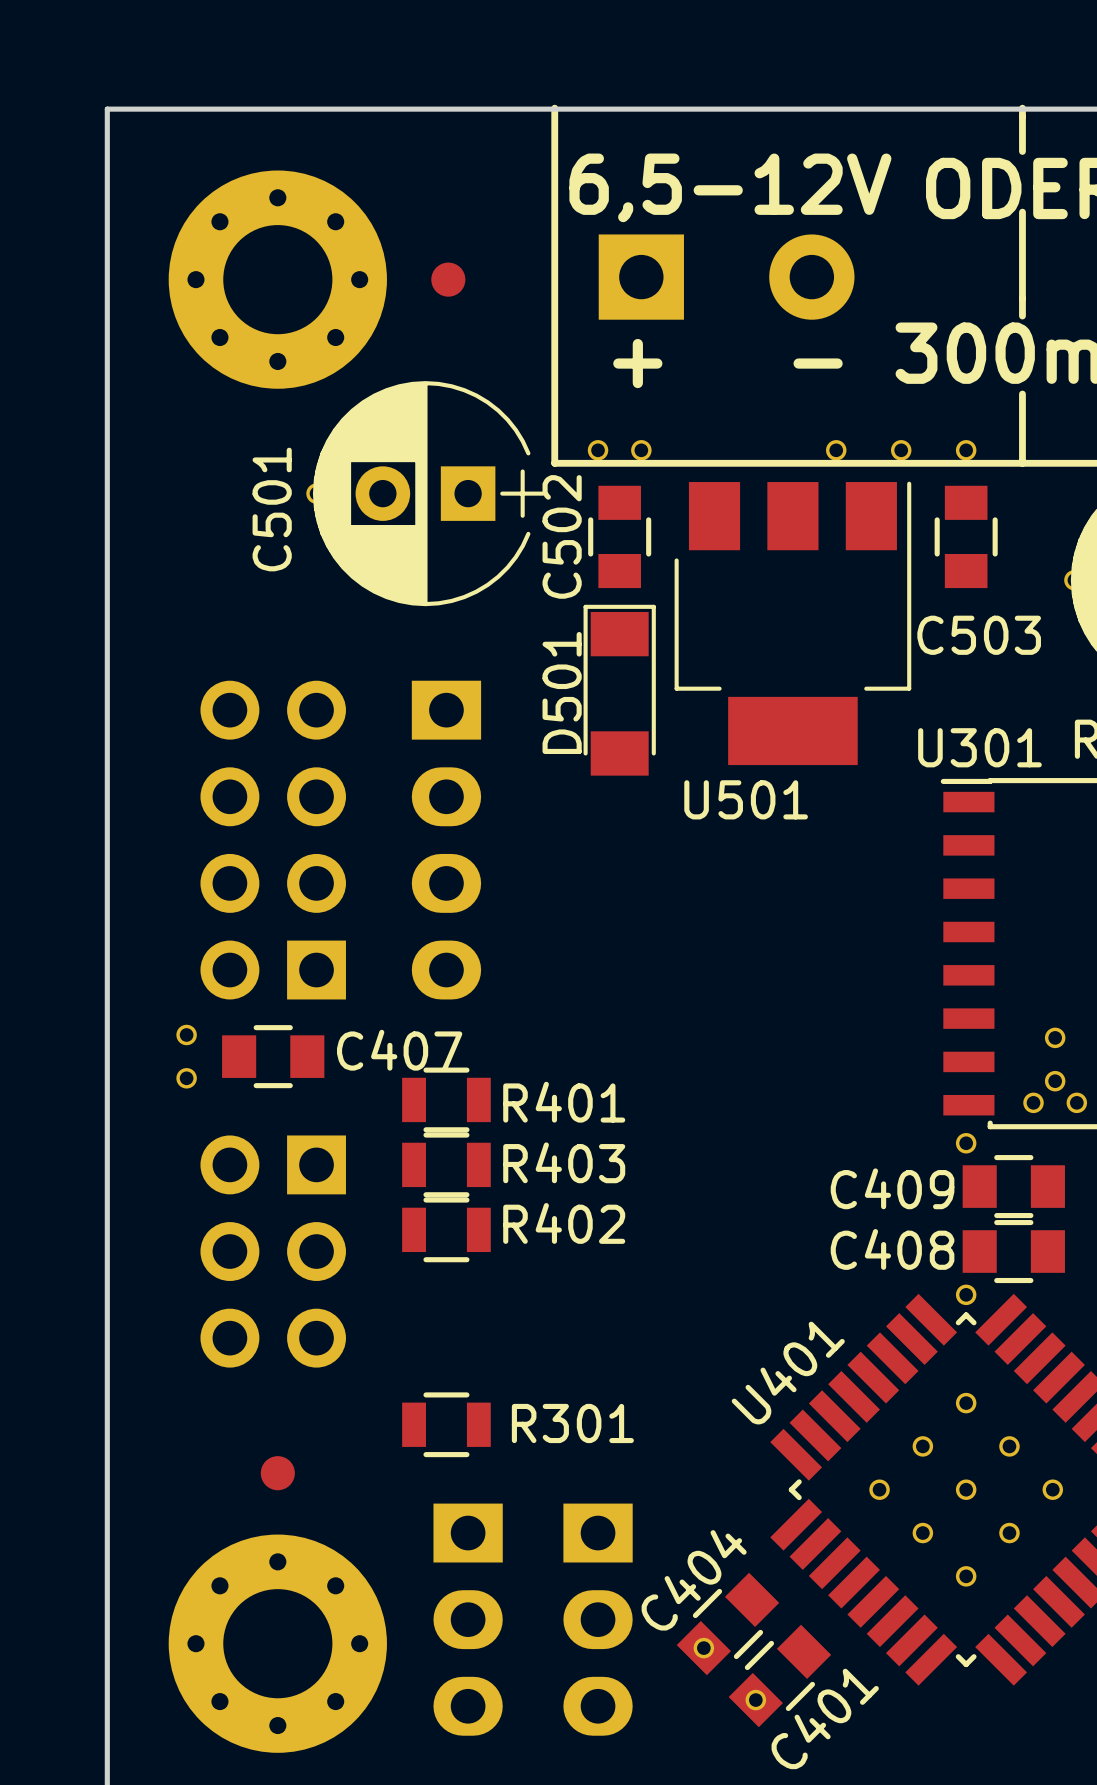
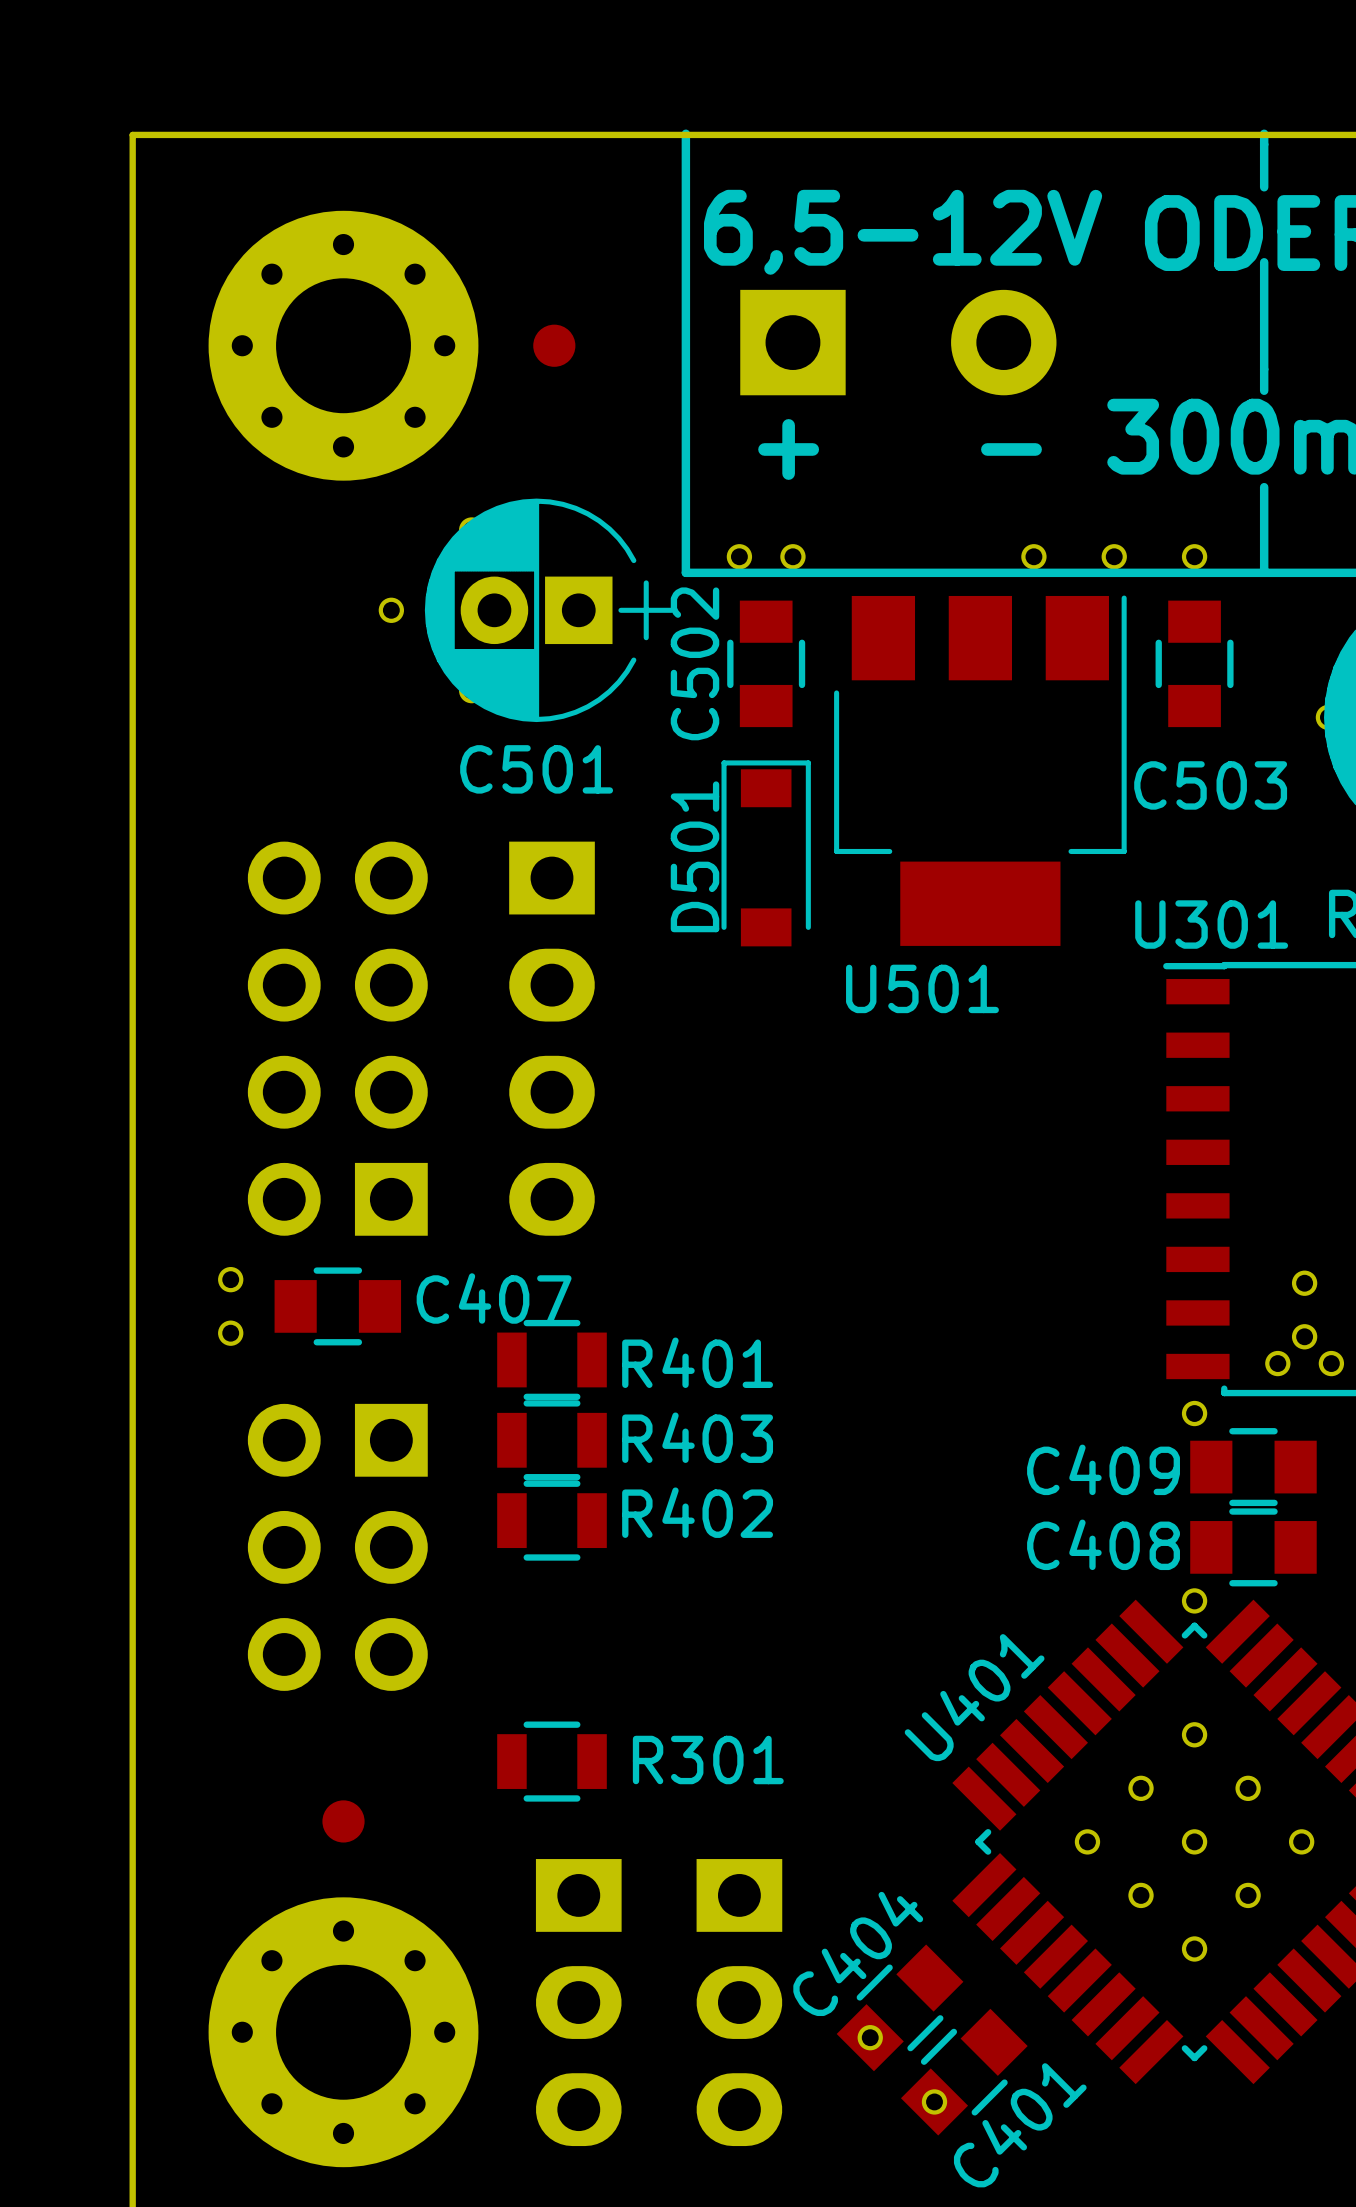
C501 footprint: [312, 381, 546, 607] -> [424, 498, 675, 723]
C501 name rotation: 0° (272, 509) -> 90° clockwise (536, 769)
C501 name position: C501 (272, 509) -> C501 (536, 769)
D501 footprint: [583, 604, 656, 776] -> [721, 760, 811, 947]

